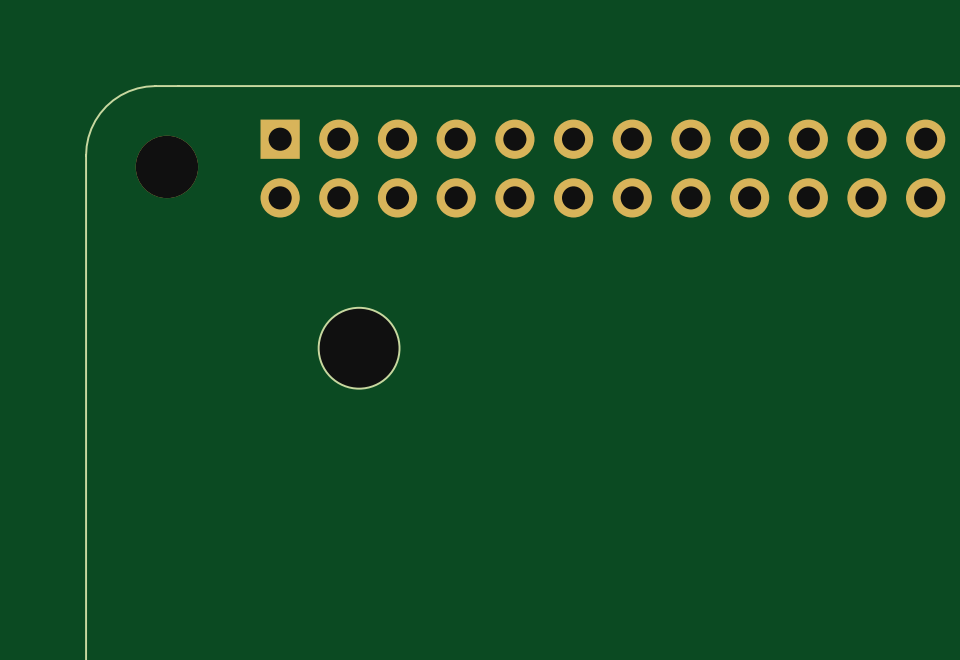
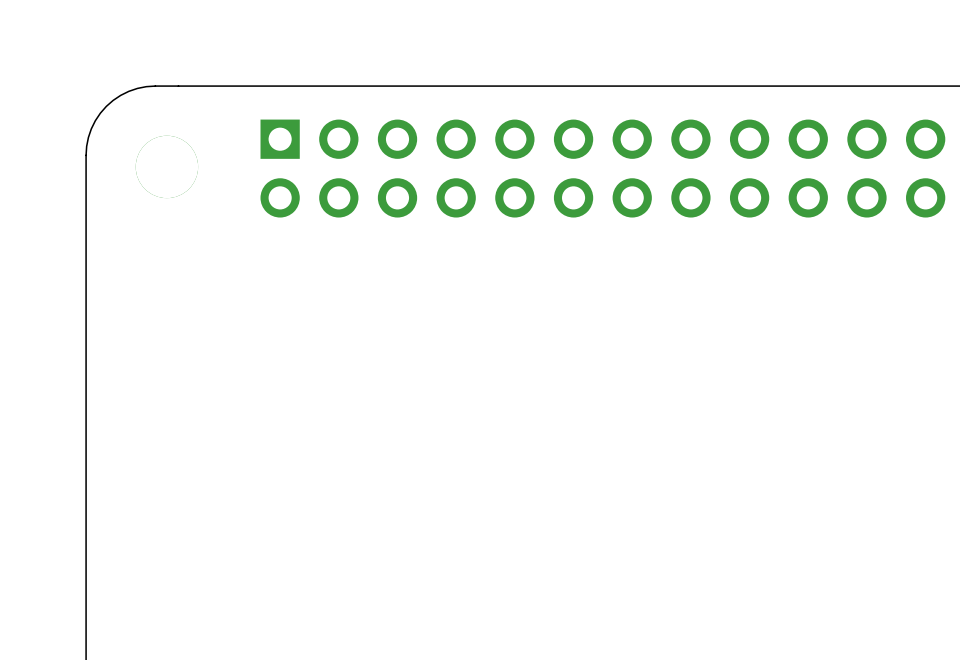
part: (359, 348) -> none

